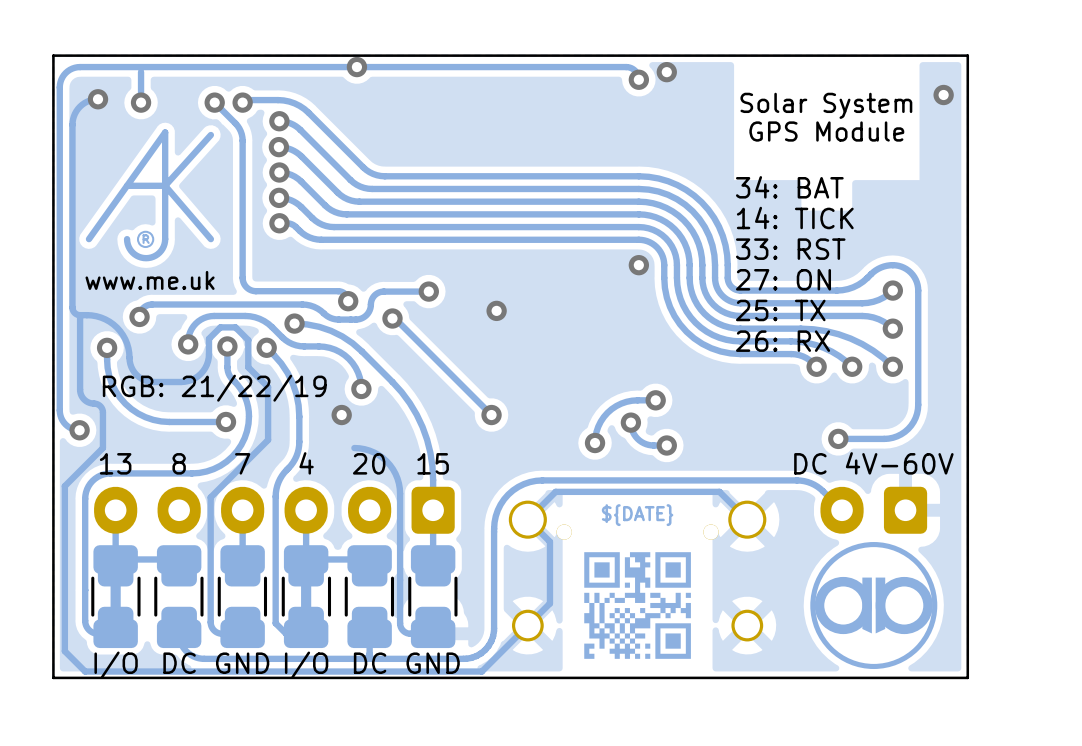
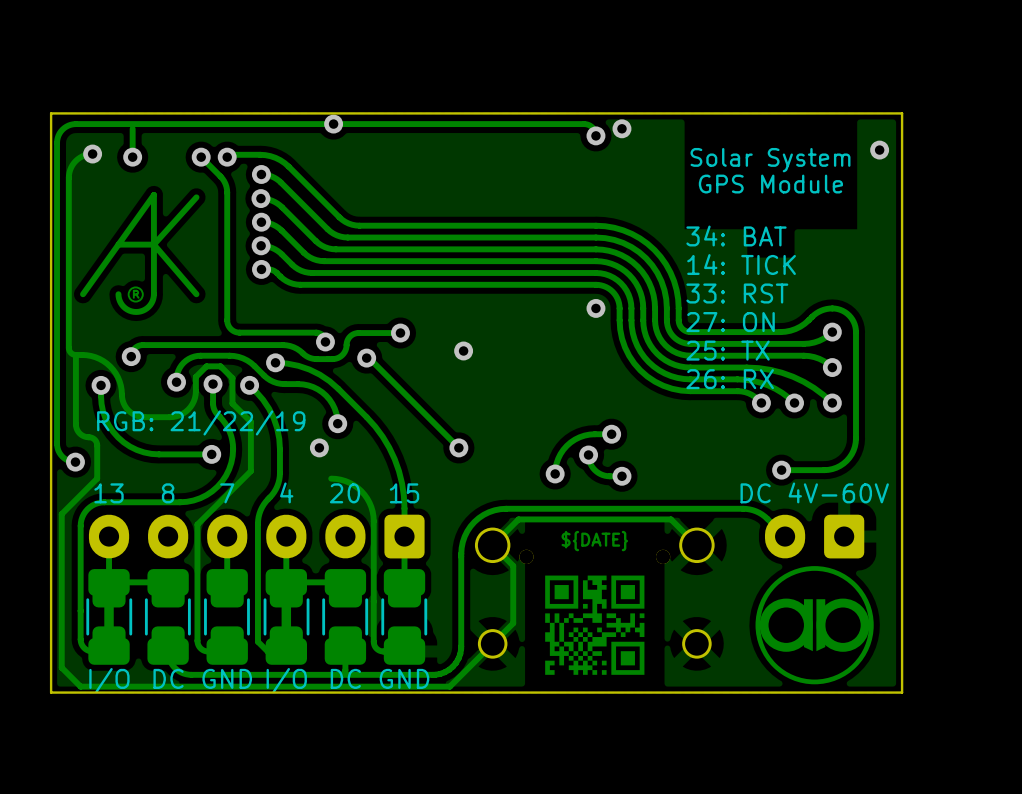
drawing shape: [85, 129, 215, 290] -> [80, 192, 200, 315]

